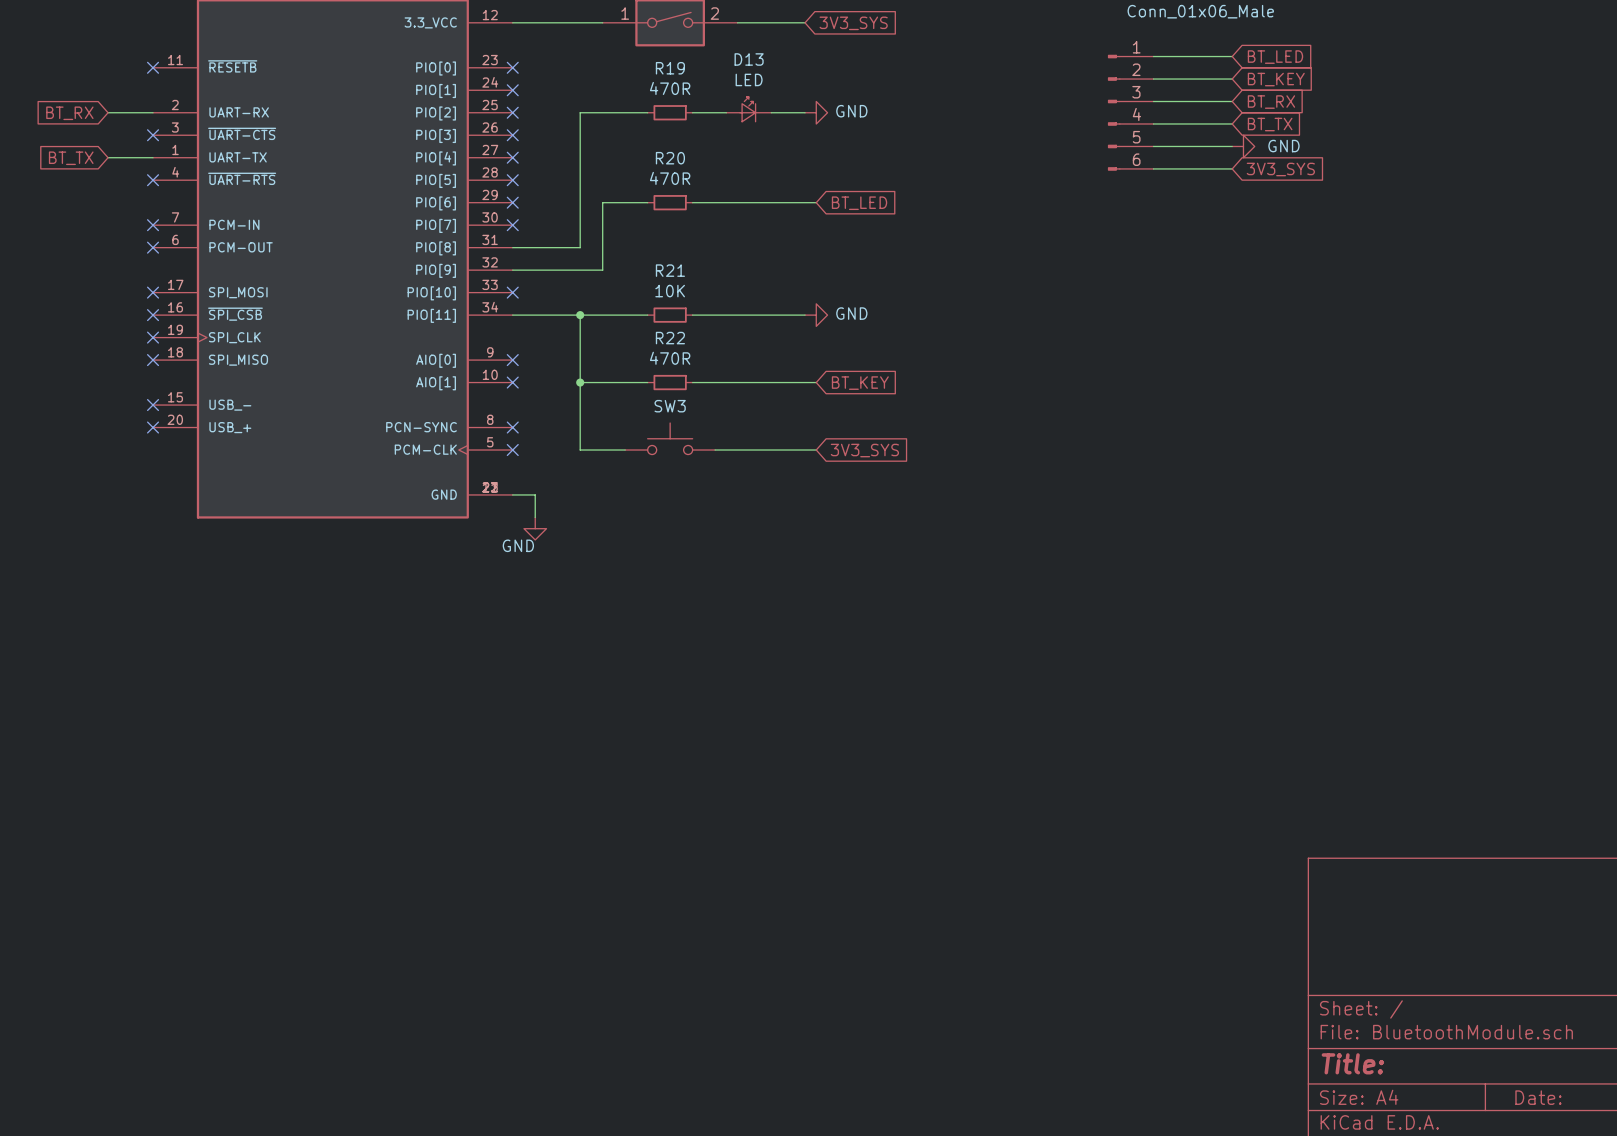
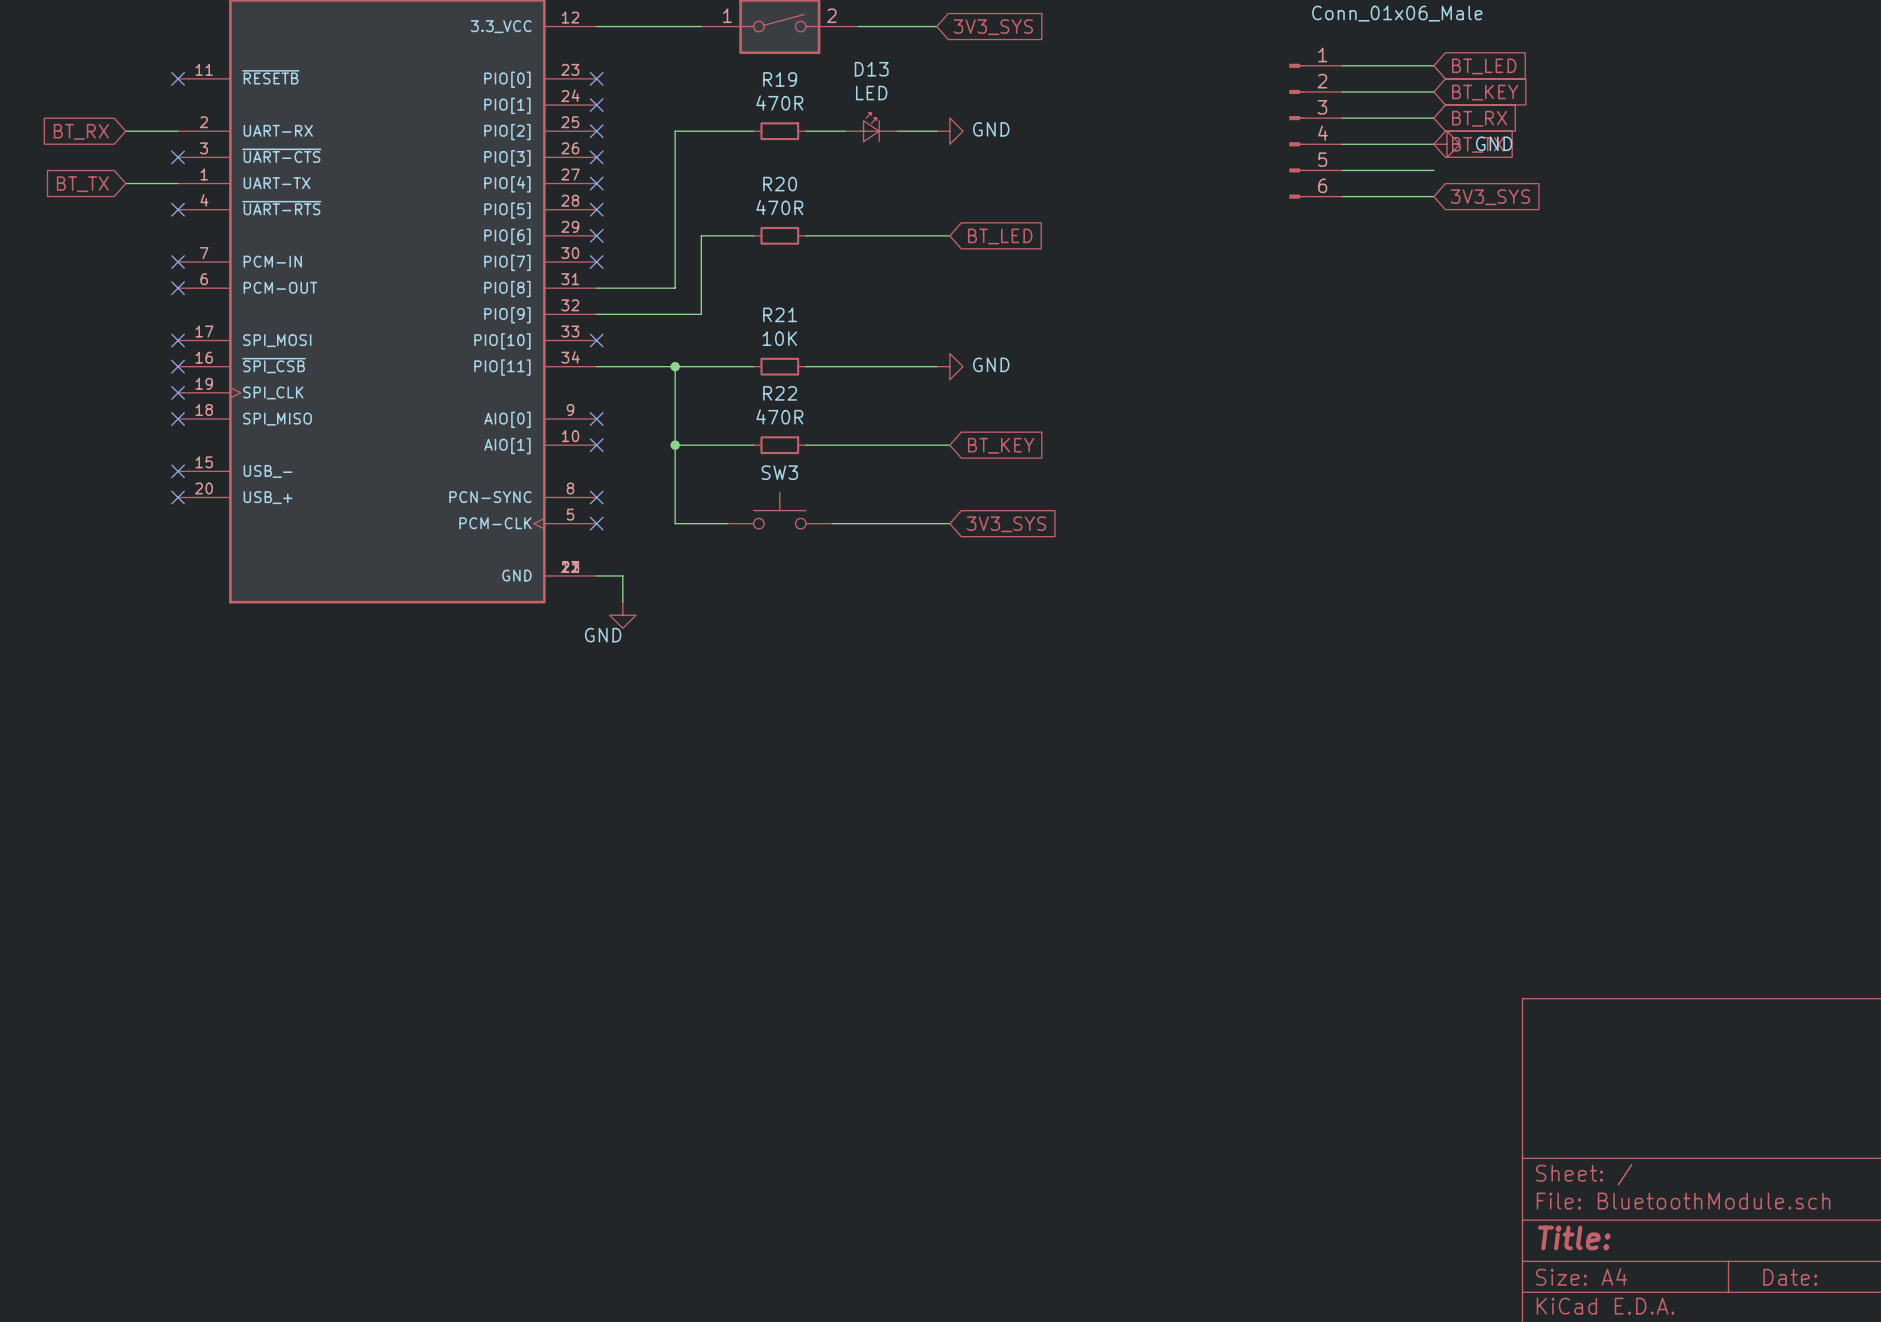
power symbol position: GND (1243, 146) -> GND (1446, 144)

